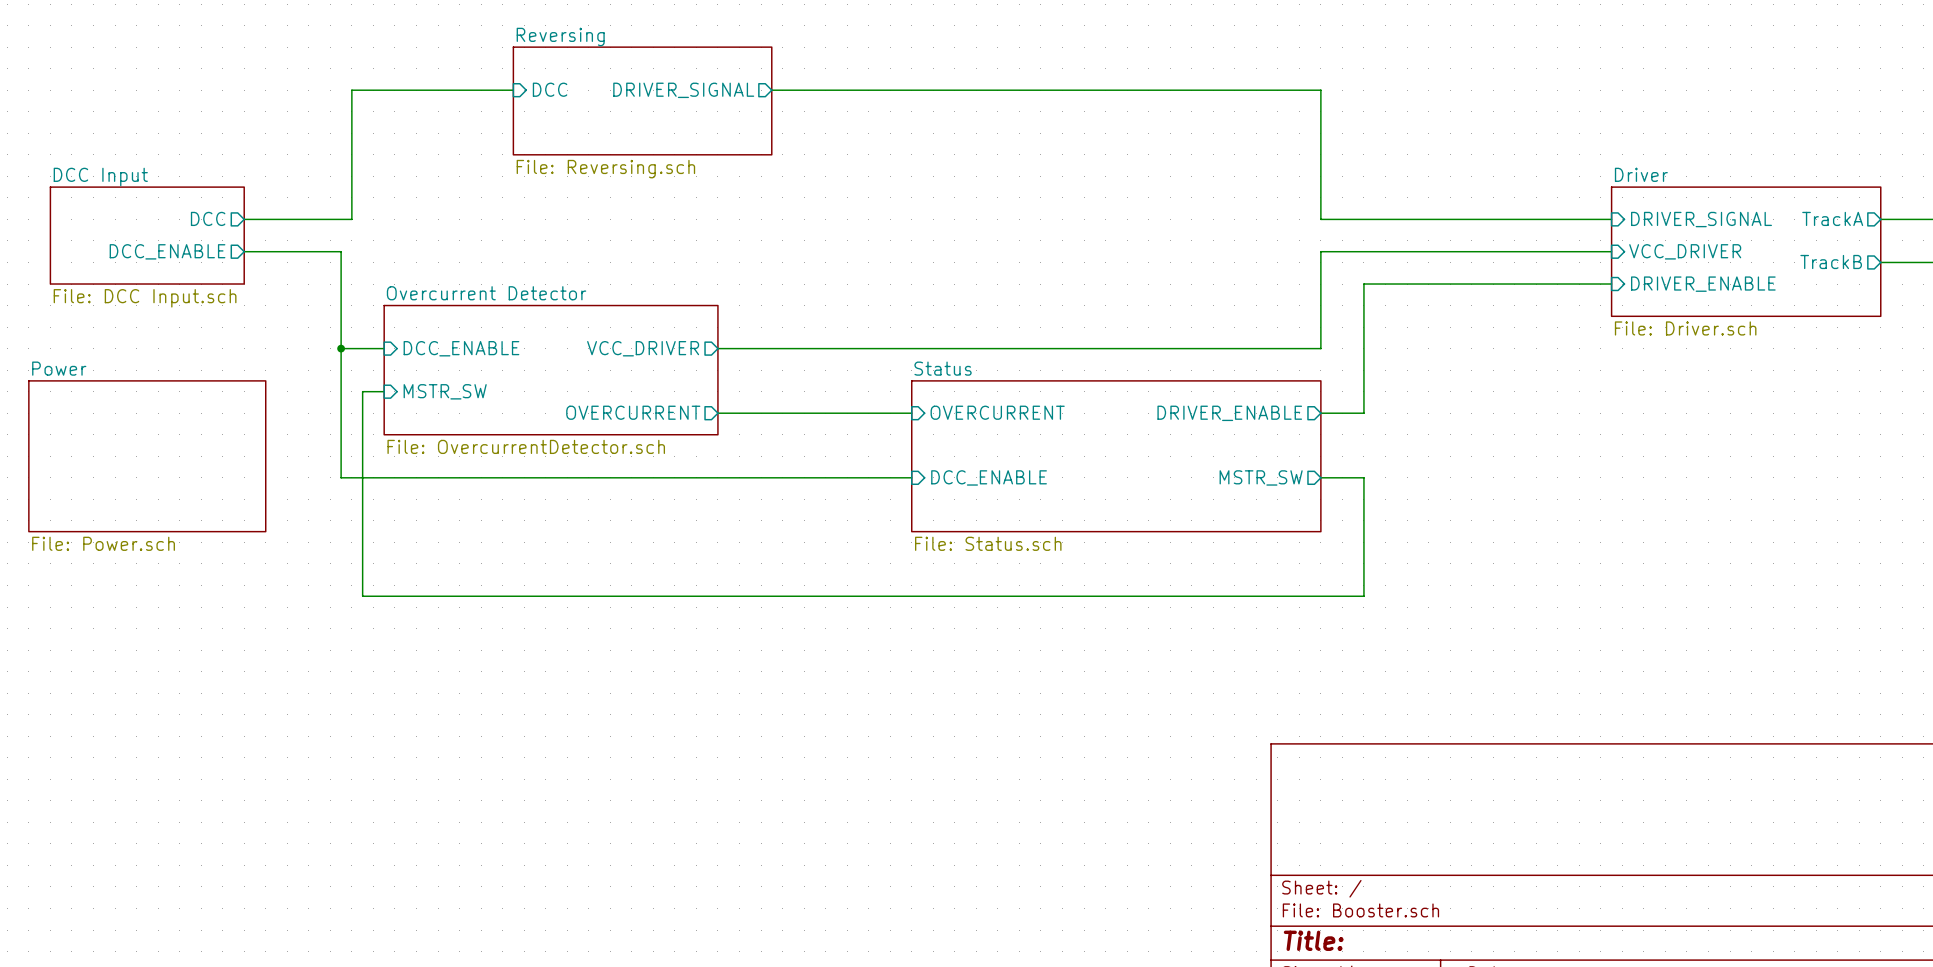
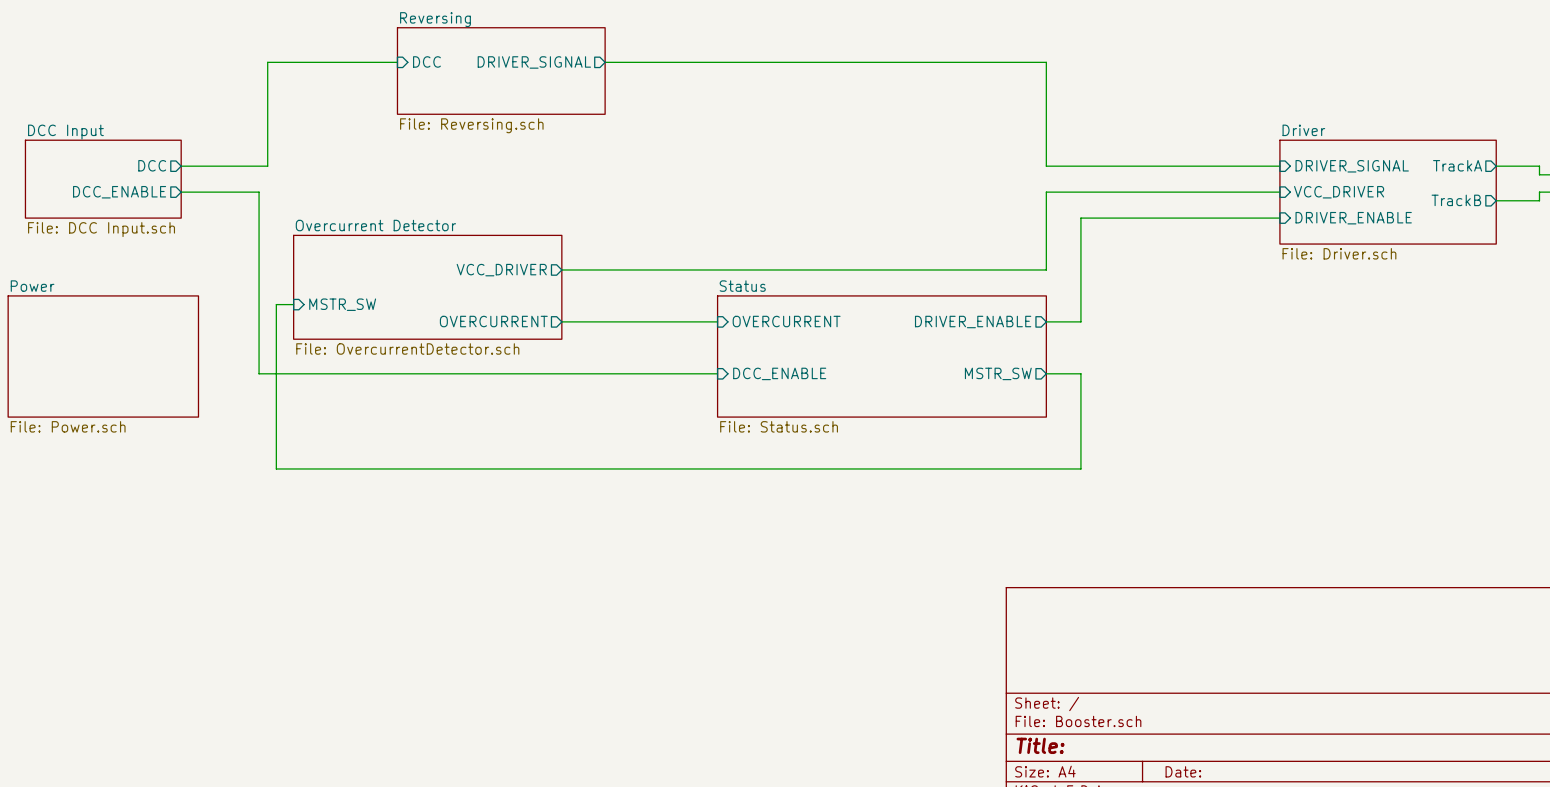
wire: (341, 348) (384, 348) -> none
junction: (341, 348) -> none
sheet pin: DCC_ENABLE (461, 348) -> none

